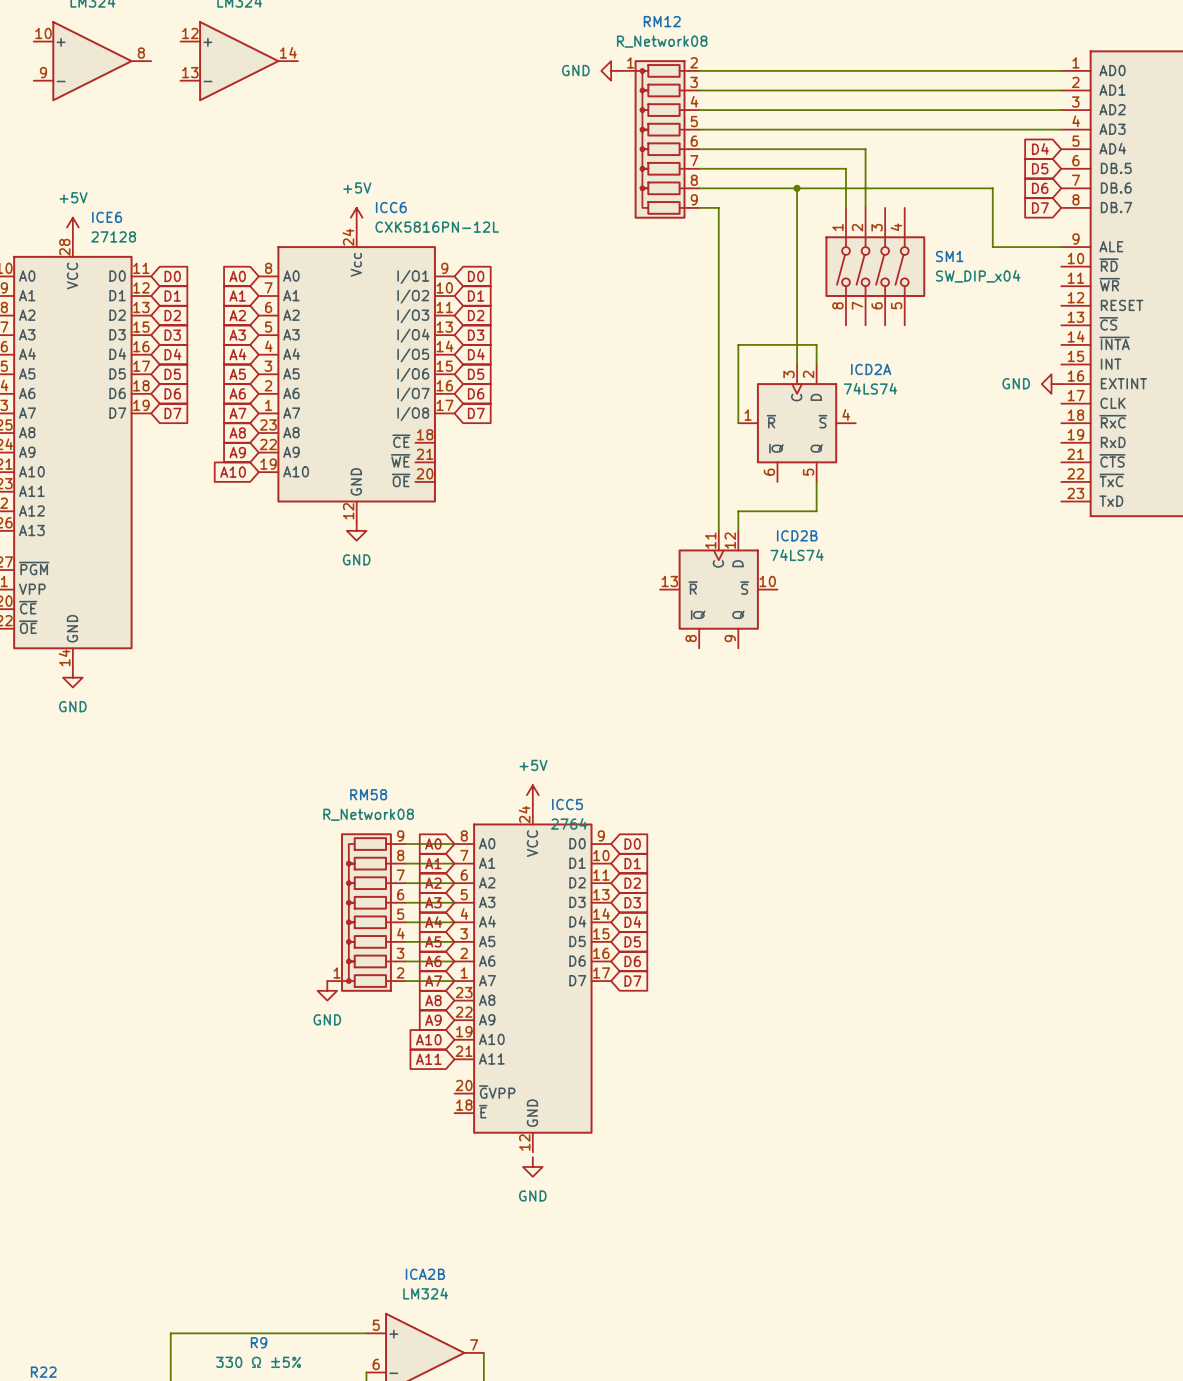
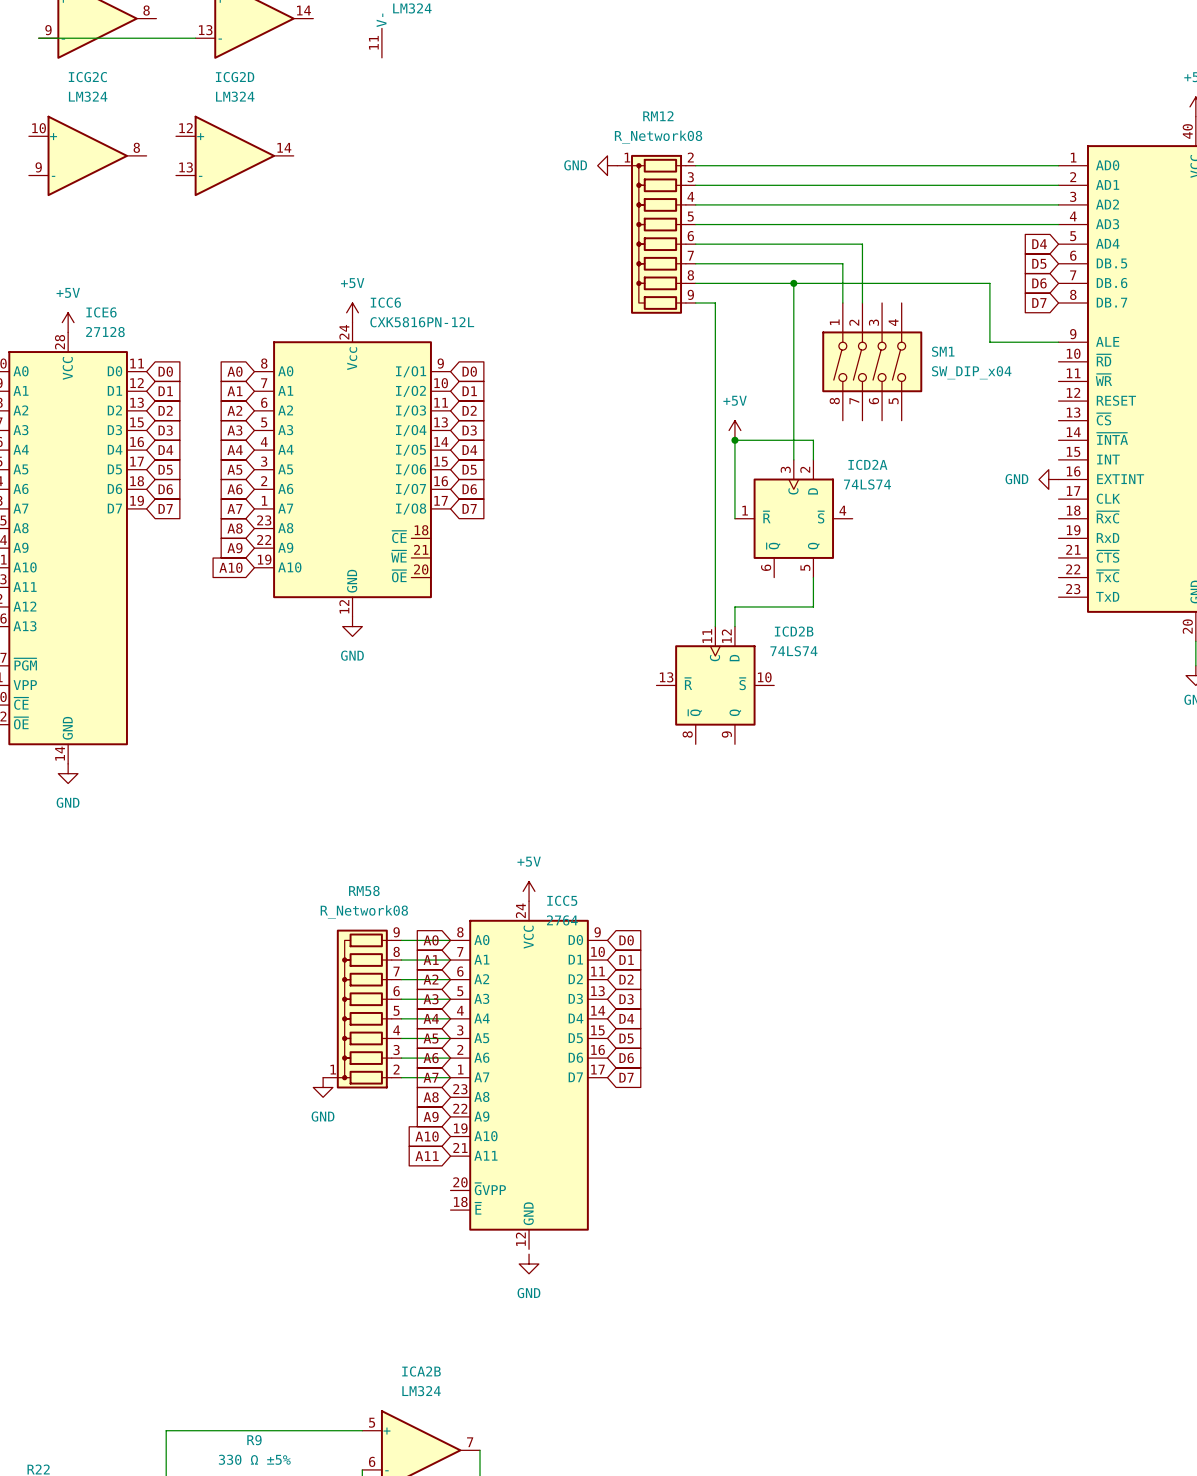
power symbol: none -> +5V (734, 430)
junction: none -> (734, 440)

